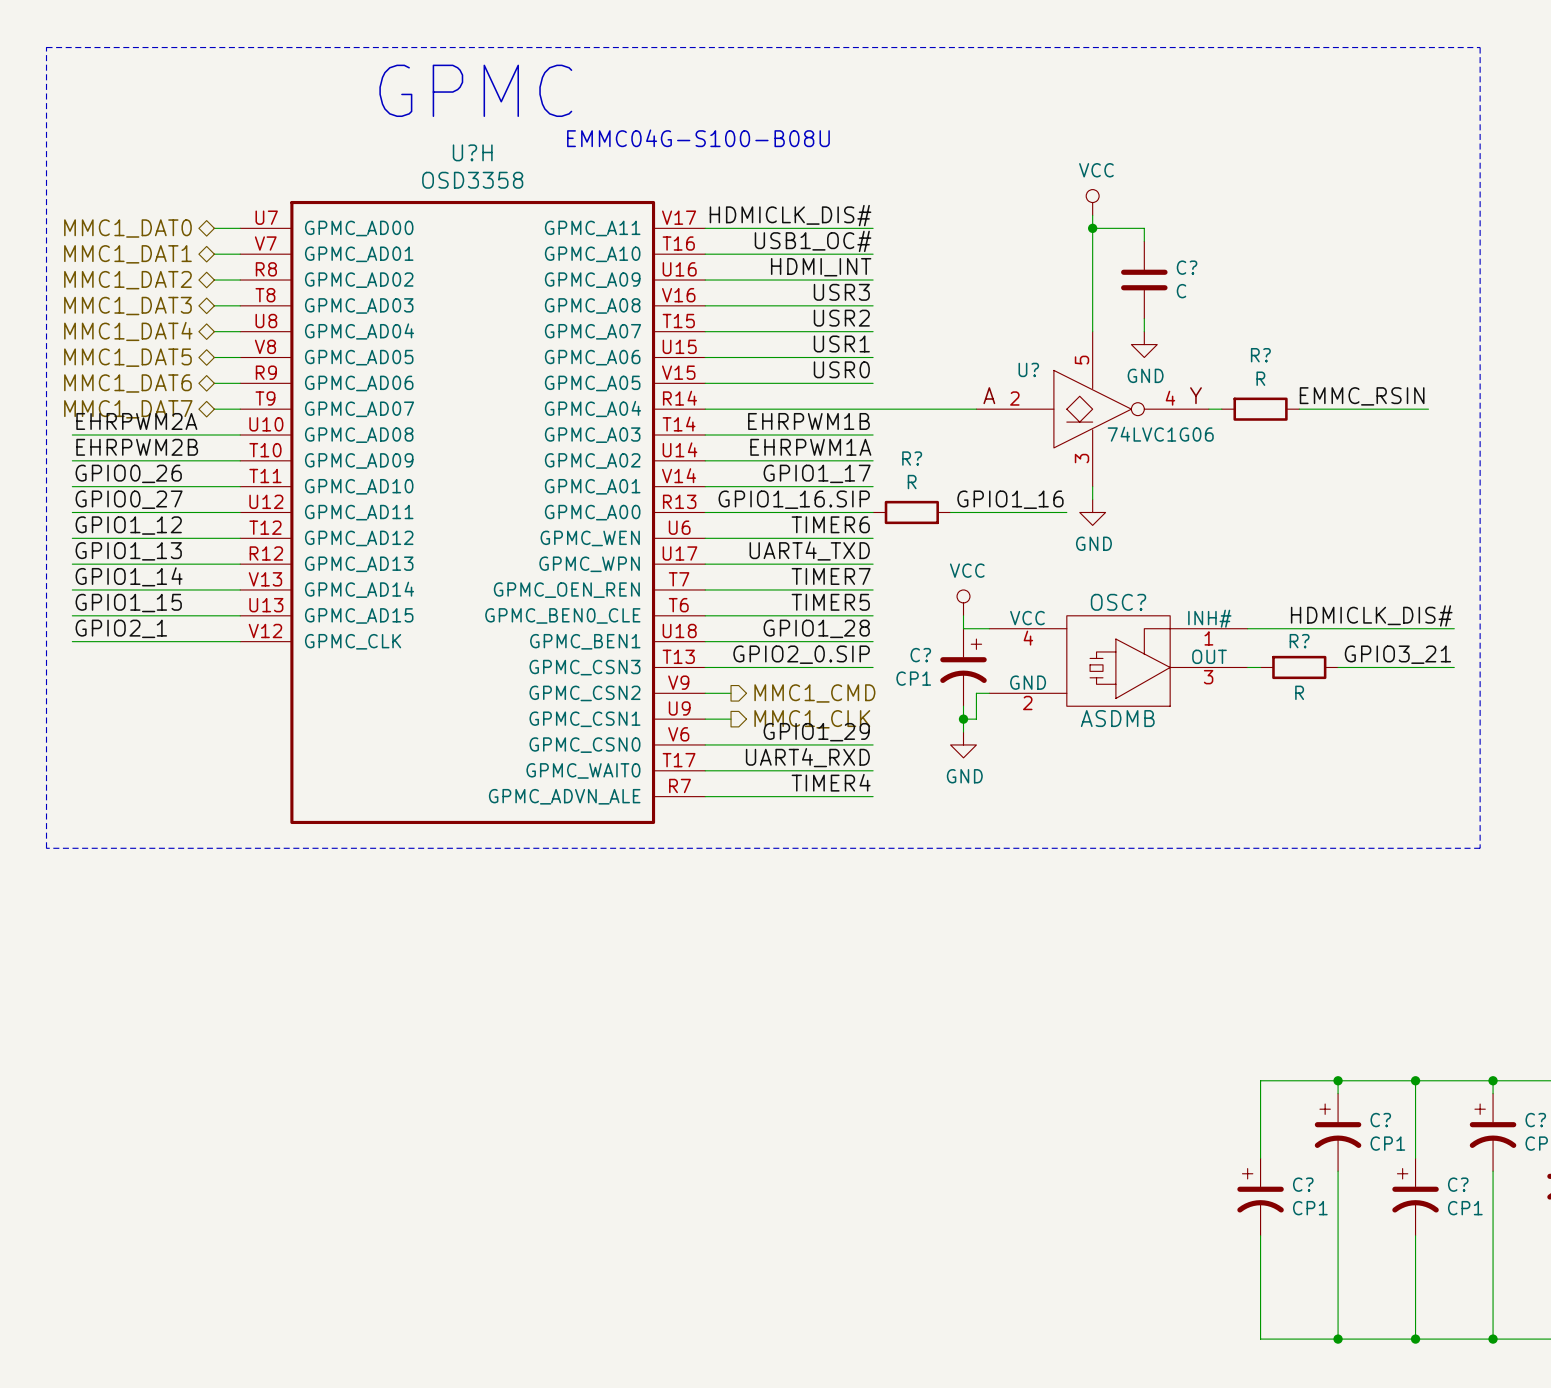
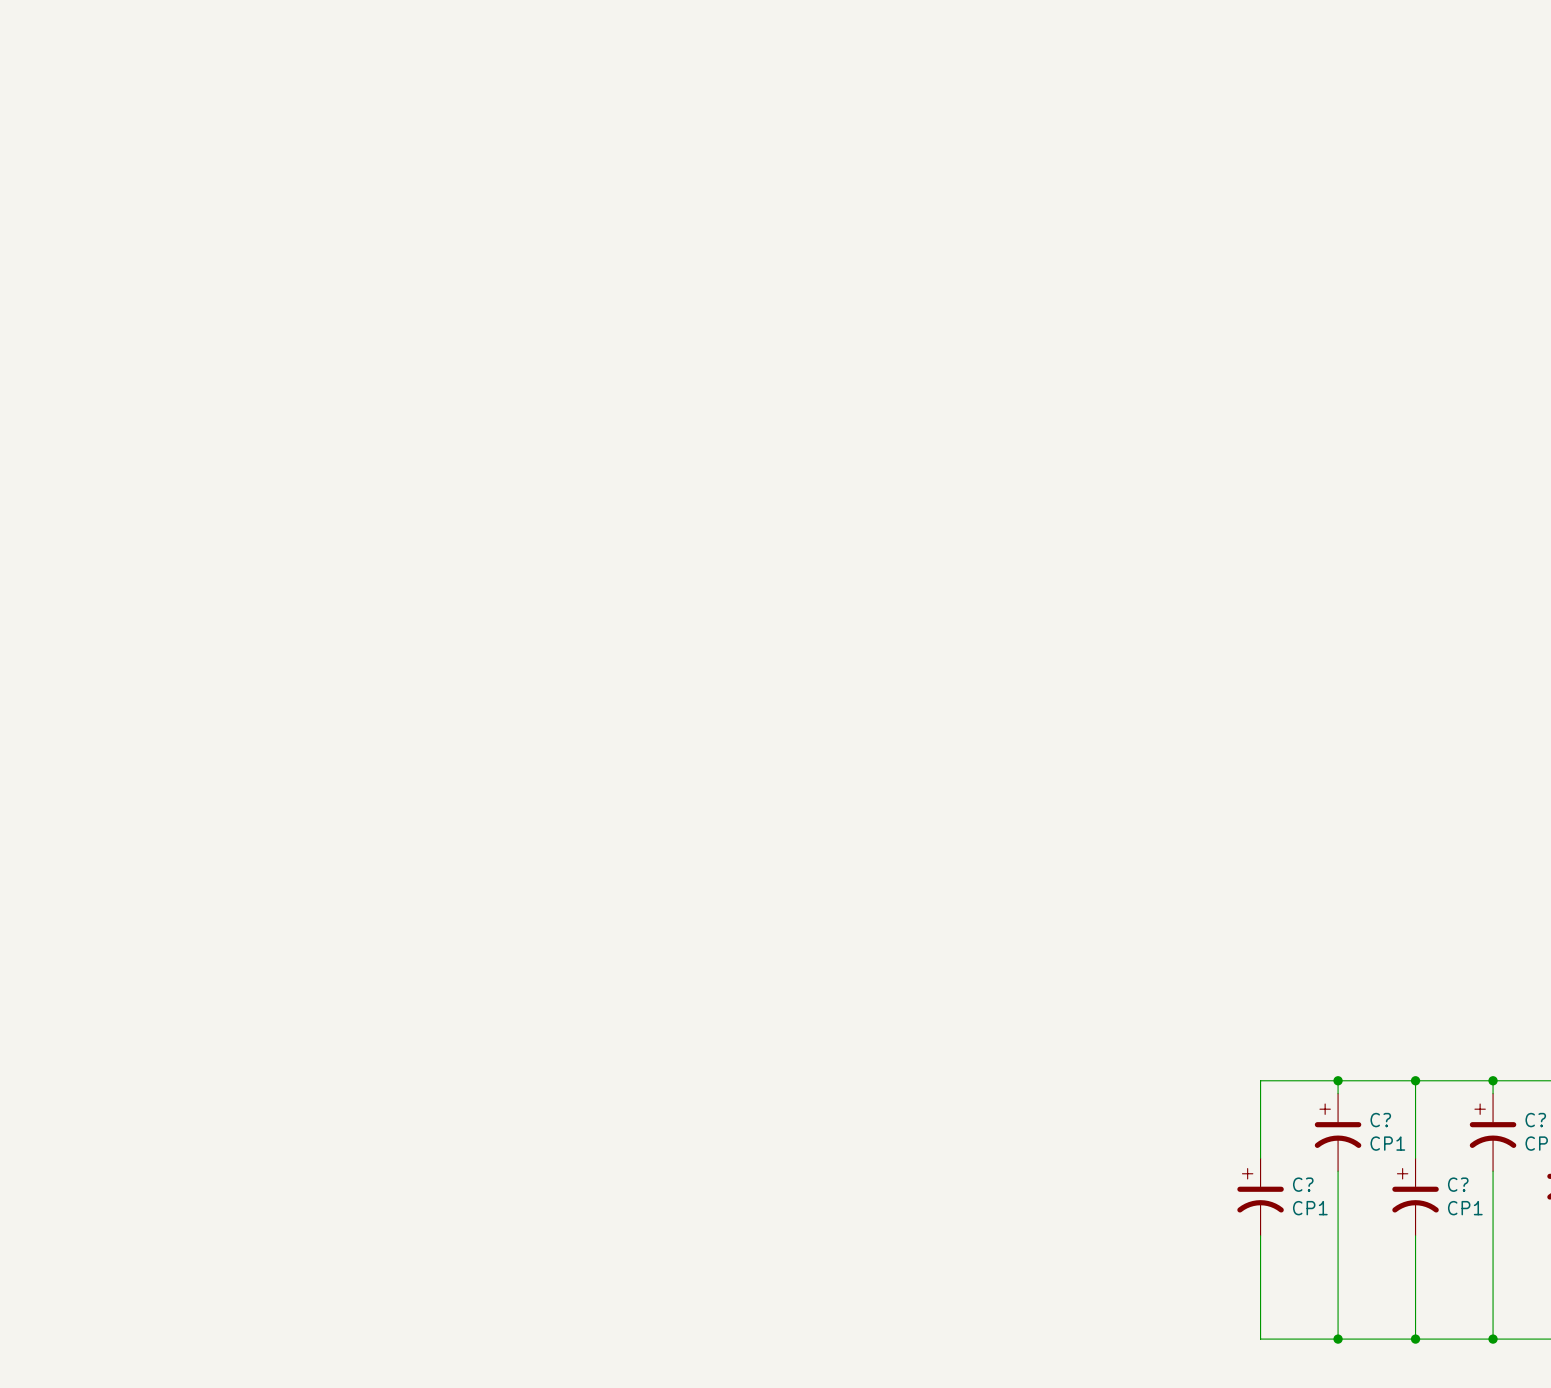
line: (46, 47) (46, 848) (1480, 848) (1480, 47) (46, 47) -> none
text: GPMC (475, 90) -> none
text: EMMC04G-S100-B08U (698, 138) -> none
power symbol: VCC (1092, 202) -> none
label: HDMICLK_DIS# (790, 215) -> none
wire: (1092, 215) (1092, 331) -> none
hierarchical label: MMC1_DAT0 (127, 228) -> none
wire: (214, 228) (240, 228) -> none
wire: (705, 228) (873, 228) -> none
wire: (1092, 228) (1144, 228) (1144, 241) -> none
junction: (1092, 228) -> none
label: USB1_OC# (813, 241) -> none
hierarchical label: MMC1_DAT1 (127, 254) -> none
wire: (214, 254) (240, 254) -> none
wire: (705, 254) (873, 254) -> none
label: HDMI_INT (821, 267) -> none
hierarchical label: MMC1_DAT2 (127, 280) -> none
wire: (214, 280) (240, 280) -> none
wire: (705, 280) (873, 280) -> none
C?: C (1144, 280) -> none
label: USR3 (841, 292) -> none
wire: (214, 305) (240, 305) -> none
wire: (705, 305) (873, 305) -> none
hierarchical label: MMC1_DAT3 (127, 306) -> none
label: USR2 (841, 318) -> none
wire: (1144, 318) (1144, 331) -> none
hierarchical label: MMC1_DAT4 (128, 331) -> none
wire: (214, 331) (240, 331) -> none
wire: (705, 331) (873, 331) -> none
label: USR1 (841, 343) -> none
power symbol: GND (1144, 344) -> none
hierarchical label: MMC1_DAT5 (127, 357) -> none
wire: (214, 357) (240, 357) -> none
wire: (705, 357) (873, 357) -> none
label: USR0 (841, 369) -> none
hierarchical label: MMC1_DAT6 (127, 383) -> none
wire: (214, 383) (240, 383) -> none
wire: (705, 383) (873, 383) -> none
label: EMMC_RSIN (1362, 396) -> none
hierarchical label: MMC1_DAT7 (128, 409) -> none
wire: (214, 409) (240, 409) -> none
wire: (705, 409) (976, 409) -> none
U?: 74LVC1G06 (1092, 409) -> none
wire: (1208, 409) (1221, 409) -> none
R?: R (1260, 409) -> none
wire: (1299, 409) (1428, 409) -> none
label: EHRPWM2A (136, 421) -> none
label: EHRPWM1B (808, 421) -> none
wire: (72, 435) (240, 435) -> none
wire: (705, 435) (873, 435) -> none
label: EHRPWM2B (137, 447) -> none
label: EHRPWM1A (810, 447) -> none
wire: (72, 460) (240, 460) -> none
wire: (705, 460) (873, 460) -> none
label: GPIO0_26 (128, 473) -> none
label: GPIO1_17 (817, 473) -> none
wire: (72, 486) (240, 486) -> none
wire: (705, 486) (873, 486) -> none
wire: (1092, 486) (1092, 499) -> none
label: GPIO0_27 (129, 499) -> none
label: GPIO1_16.SIP (794, 499) -> none
label: GPIO1_16 (1010, 499) -> none
wire: (72, 512) (240, 512) -> none
U?H: OSD3358 (472, 512) -> none
wire: (705, 512) (873, 512) -> none
R?: R (911, 512) -> none
wire: (950, 512) (1066, 512) -> none
power symbol: GND (1092, 512) -> none
label: TIMER6 (830, 524) -> none
label: GPIO1_12 (128, 525) -> none
wire: (72, 538) (240, 538) -> none
wire: (705, 538) (873, 538) -> none
label: GPIO1_13 (128, 551) -> none
label: UART4_TXD (809, 551) -> none
wire: (72, 564) (240, 564) -> none
wire: (705, 564) (873, 564) -> none
label: GPIO1_14 (129, 576) -> none
label: TIMER7 (831, 576) -> none
wire: (72, 589) (240, 589) -> none
wire: (705, 589) (873, 589) -> none
label: TIMER5 (830, 602) -> none
power symbol: VCC (963, 602) -> none
label: GPIO1_15 (128, 603) -> none
wire: (72, 615) (240, 615) -> none
wire: (705, 615) (873, 615) -> none
wire: (963, 615) (963, 628) (989, 628) -> none
label: HDMICLK_DIS# (1371, 615) -> none
label: GPIO2_1 (121, 628) -> none
label: GPIO1_28 (816, 628) -> none
wire: (1247, 628) (1454, 628) -> none
wire: (72, 641) (240, 641) -> none
wire: (705, 641) (873, 641) -> none
label: GPIO2_0.SIP (801, 654) -> none
label: GPIO3_21 (1397, 654) -> none
OSC?: ASDMB (1118, 661) -> none
wire: (705, 667) (873, 667) -> none
C?: CP1 (963, 667) -> none
wire: (1247, 667) (1260, 667) -> none
R?: R (1299, 667) -> none
wire: (1338, 667) (1454, 667) -> none
wire: (705, 693) (731, 693) -> none
hierarchical label: MMC1_CMD (814, 693) -> none
wire: (989, 693) (976, 693) (976, 719) (963, 719) -> none
wire: (963, 706) (963, 732) -> none
wire: (705, 719) (731, 719) -> none
hierarchical label: MMC1_CLK (812, 719) -> none
junction: (963, 719) -> none
label: GPIO1_29 (816, 732) -> none
wire: (705, 744) (873, 744) -> none
power symbol: GND (963, 744) -> none
label: UART4_RXD (807, 757) -> none
wire: (705, 770) (873, 770) -> none
label: TIMER4 (831, 782) -> none
wire: (705, 796) (873, 796) -> none

